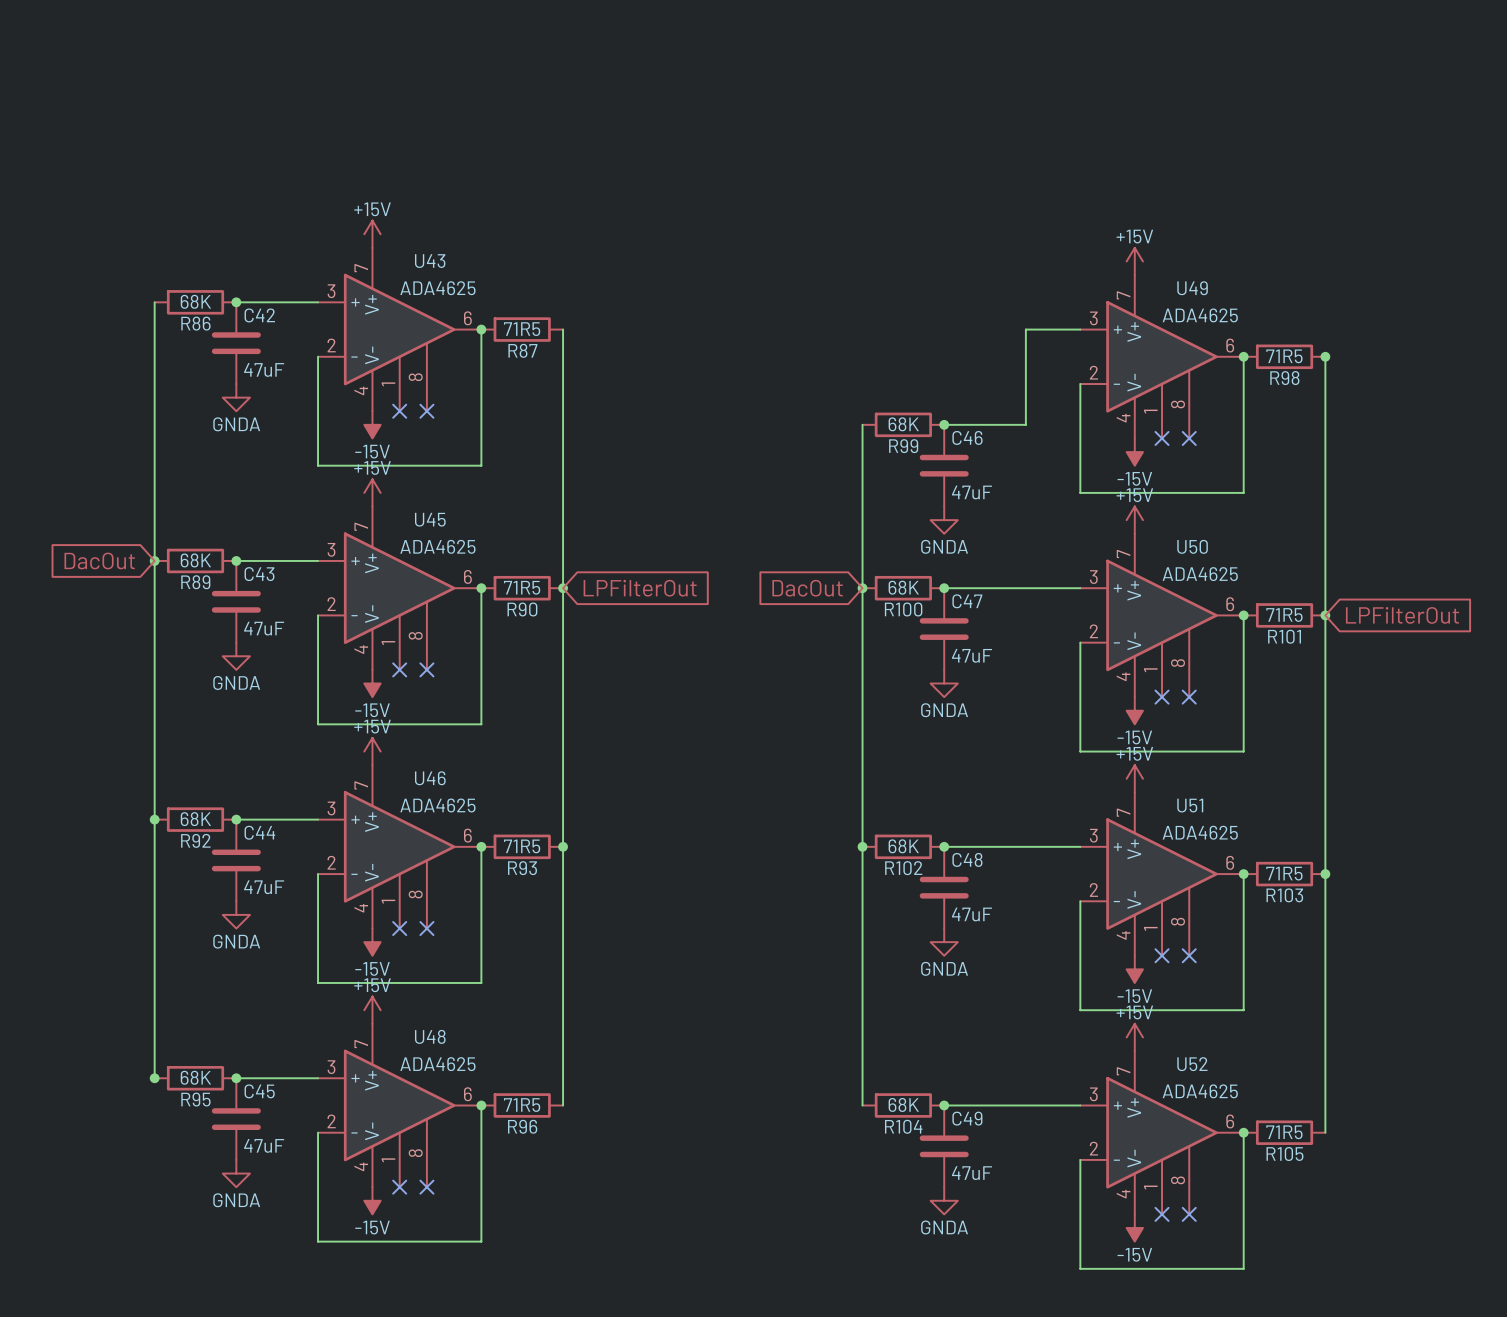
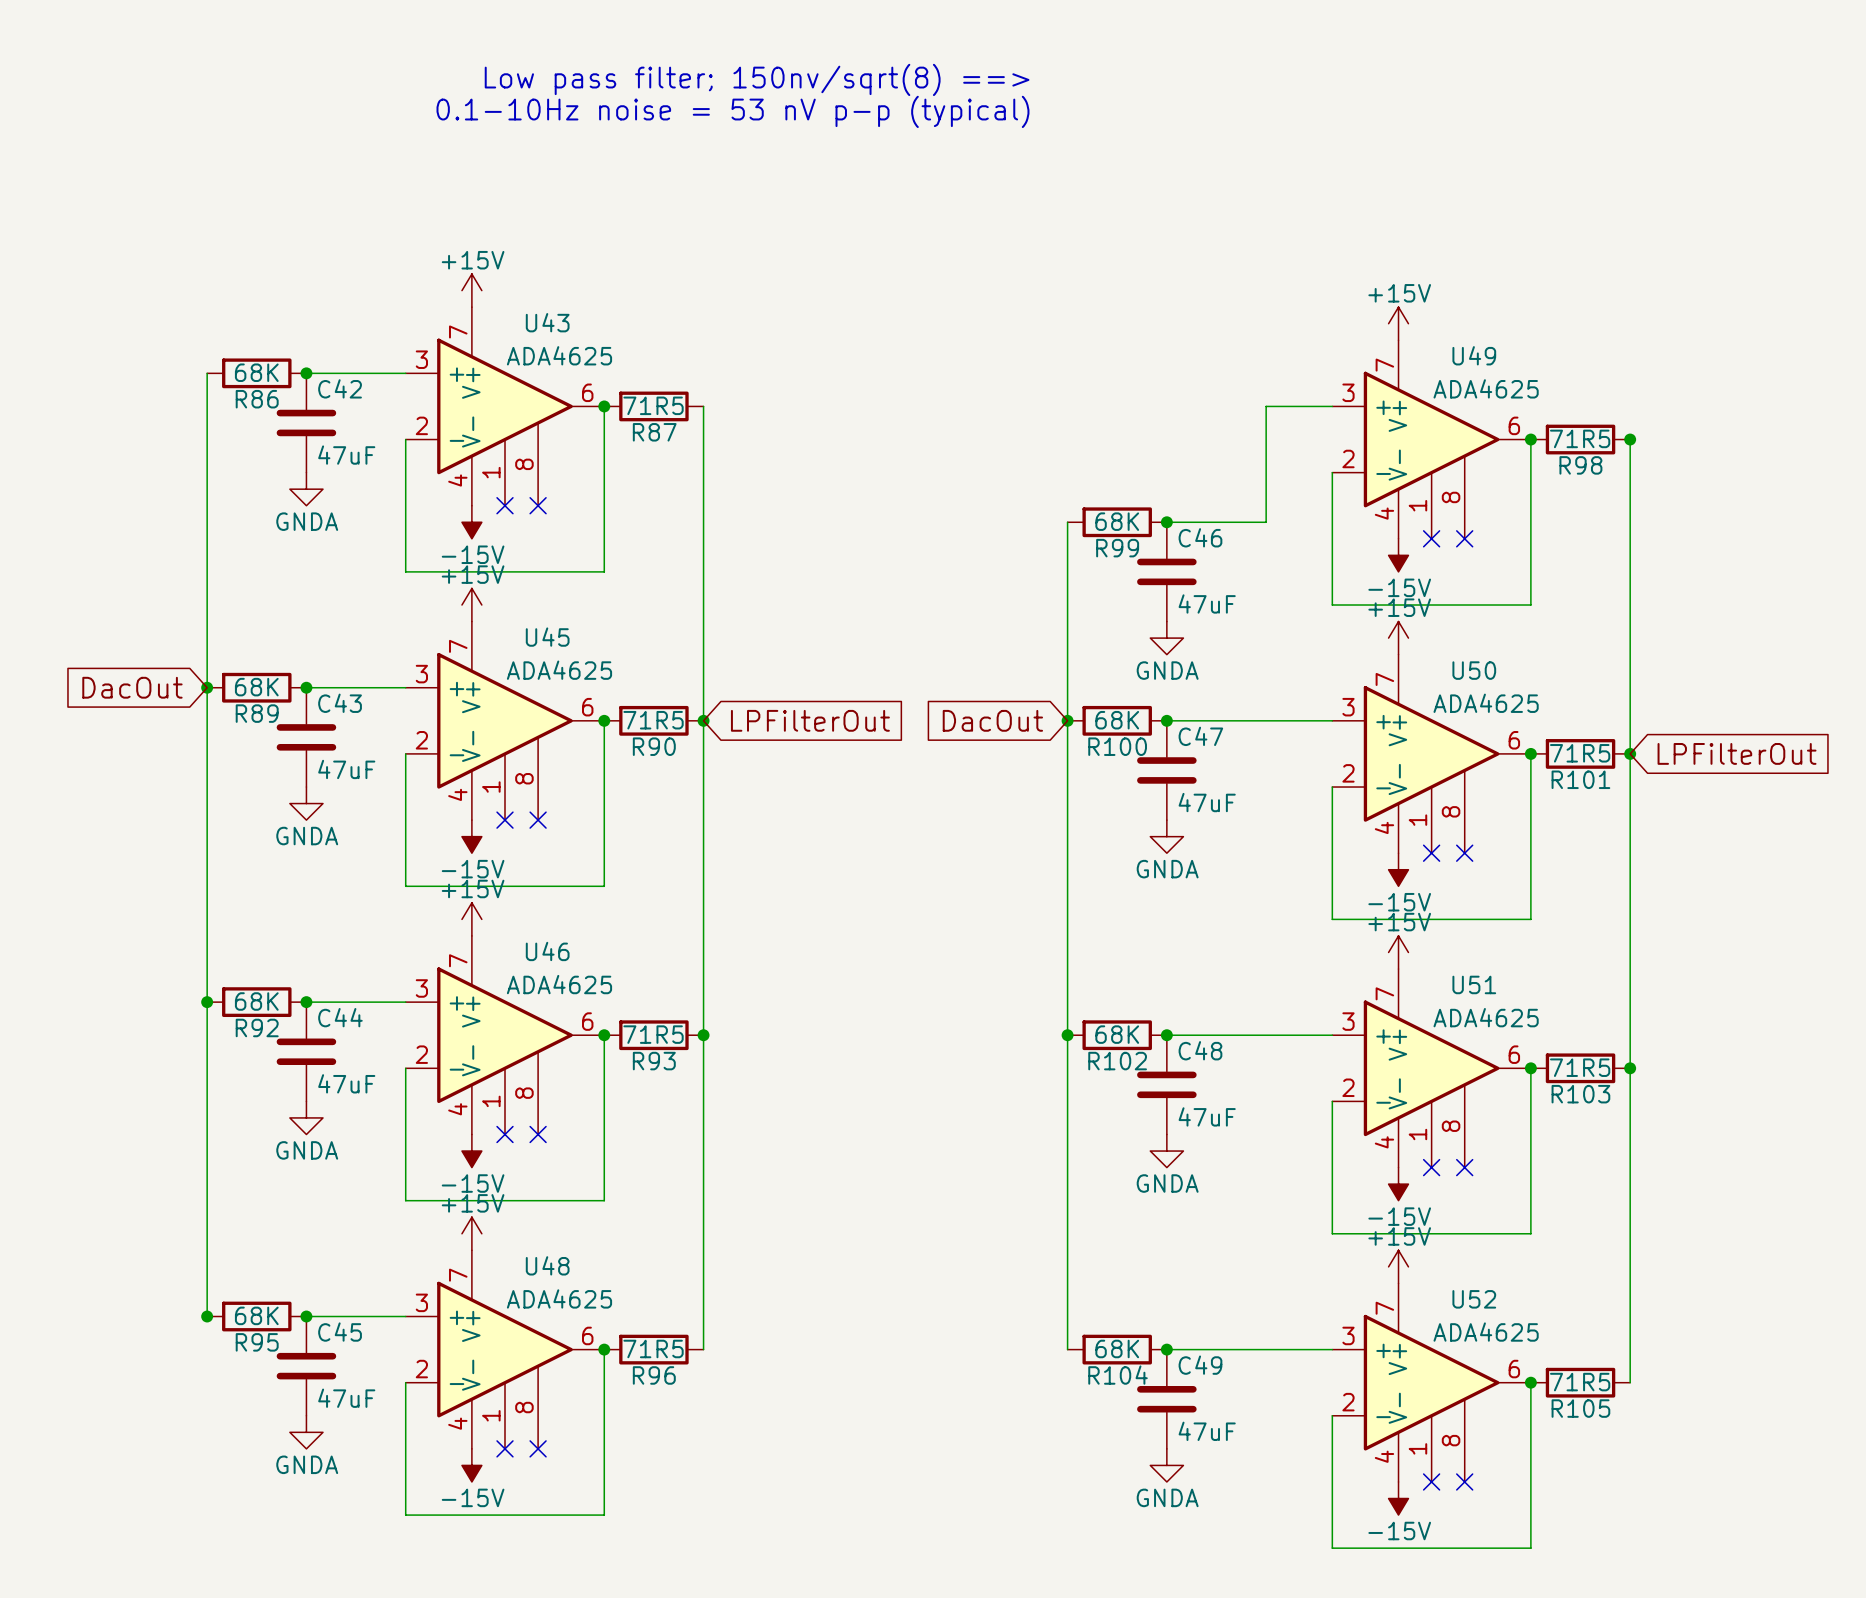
text: none -> Low pass filter; 150nv/sqrt(8) ==> (757, 79)
text: none -> 0.1-10Hz noise = 53 nV p-p (typical) (732, 111)

